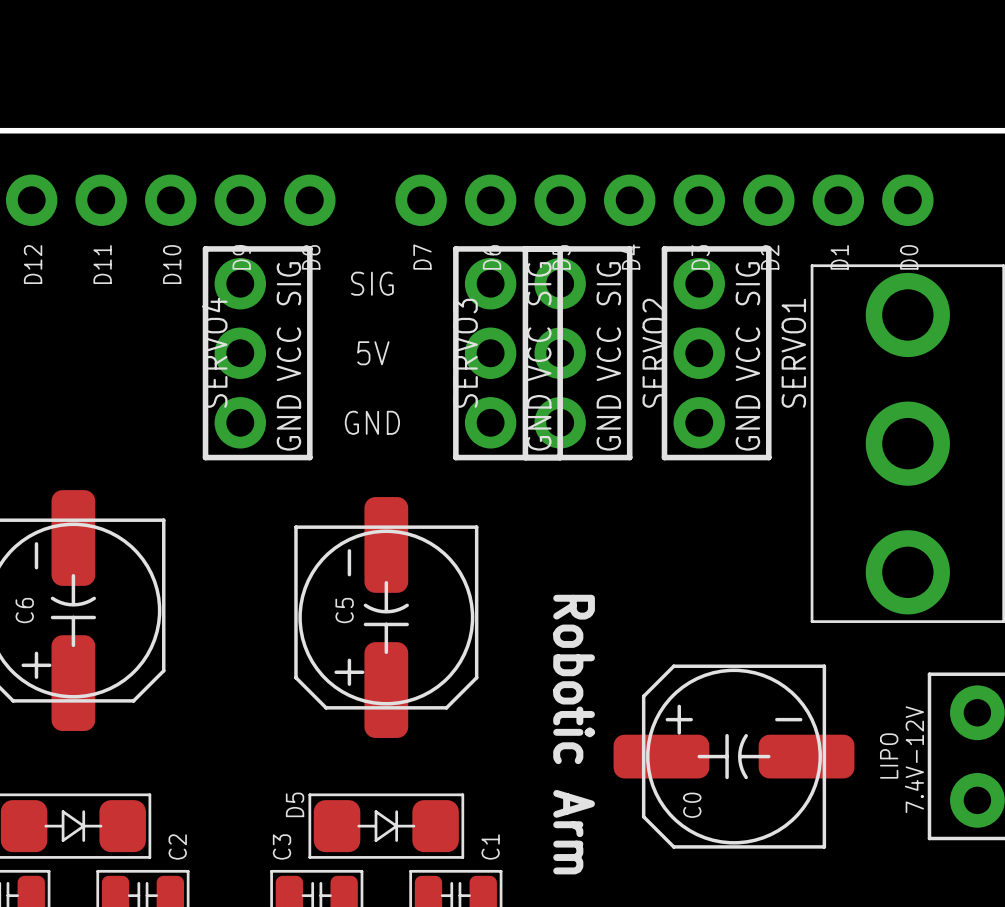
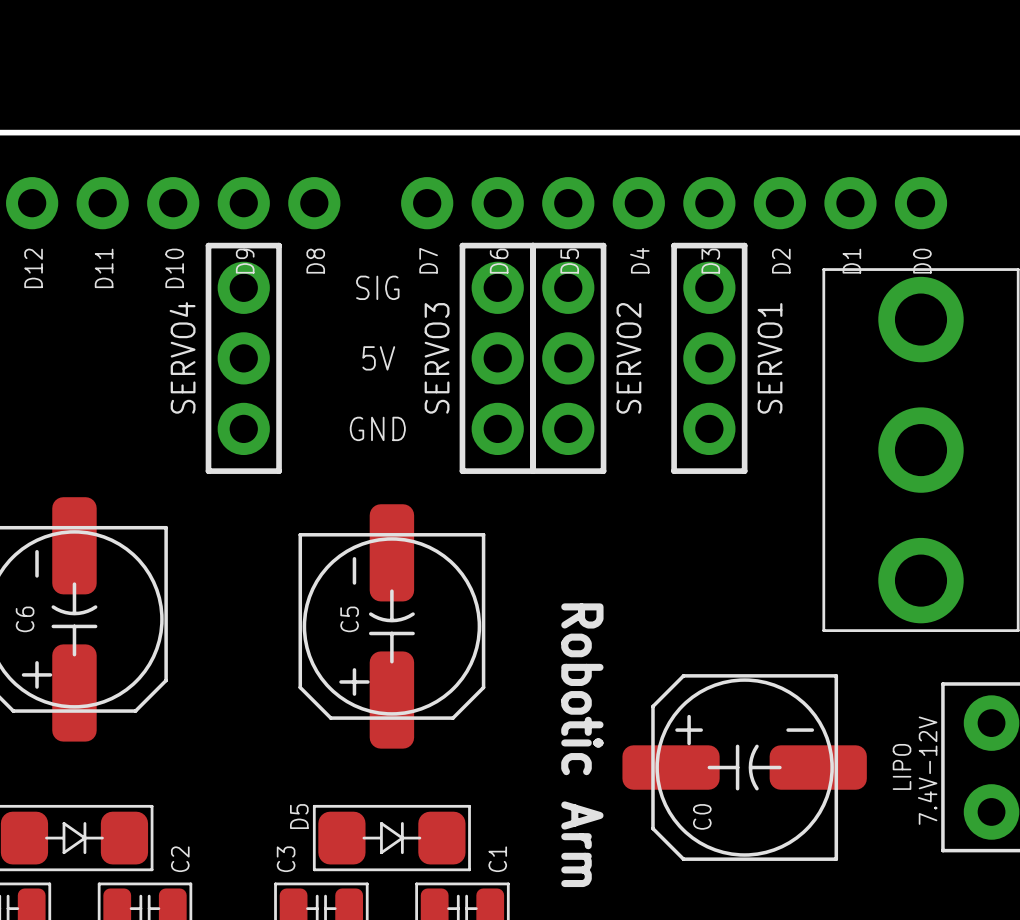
SERVO4 footprint: [202, 246, 313, 461] -> [205, 242, 282, 474]
SERVO3 footprint: [453, 246, 563, 461] -> [459, 242, 536, 474]
SERVO2 footprint: [522, 246, 633, 461] -> [530, 242, 607, 474]
SERVO1 footprint: [661, 246, 772, 461] -> [671, 242, 748, 474]

